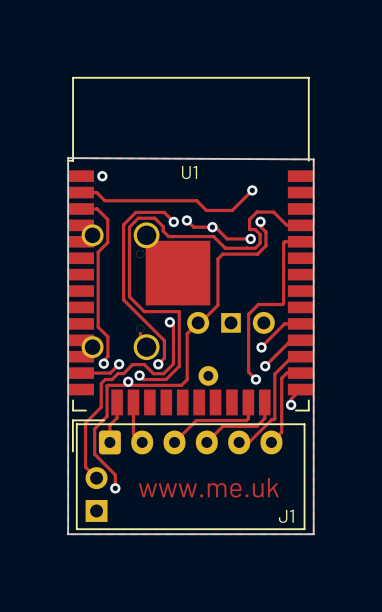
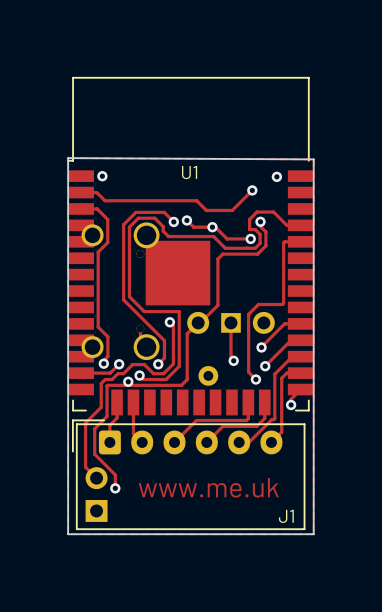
via: none -> (276, 176)
track: none -> (230, 322) (230, 358) (233, 360)
via: none -> (233, 360)

